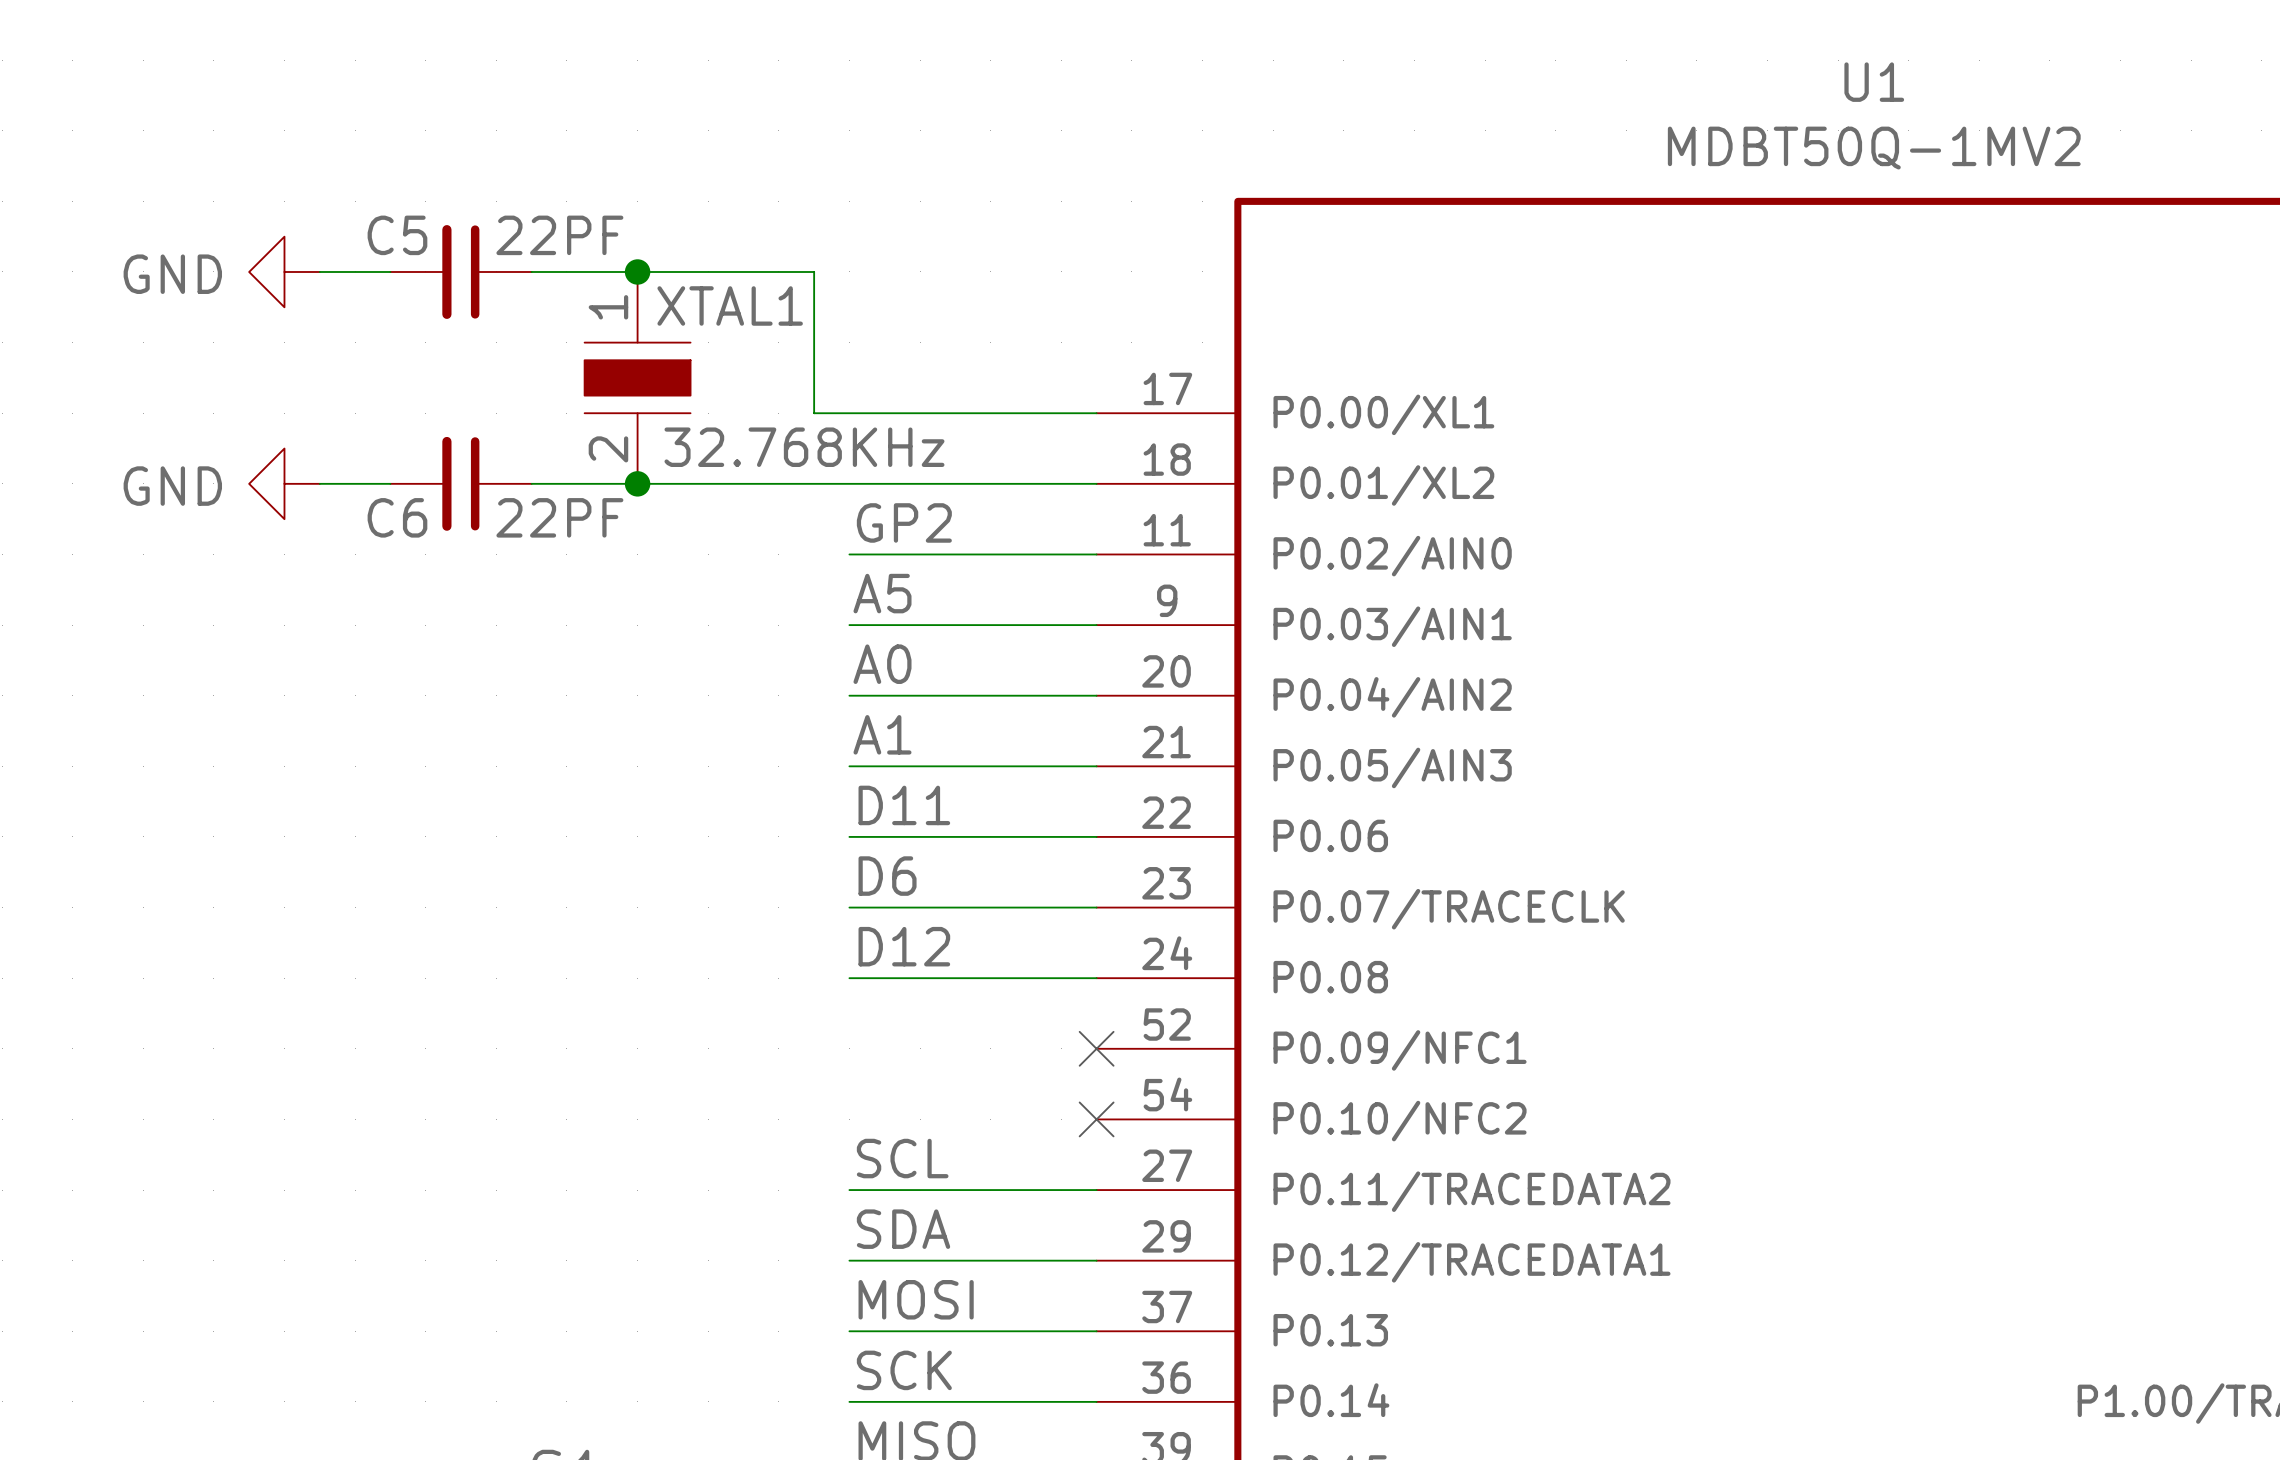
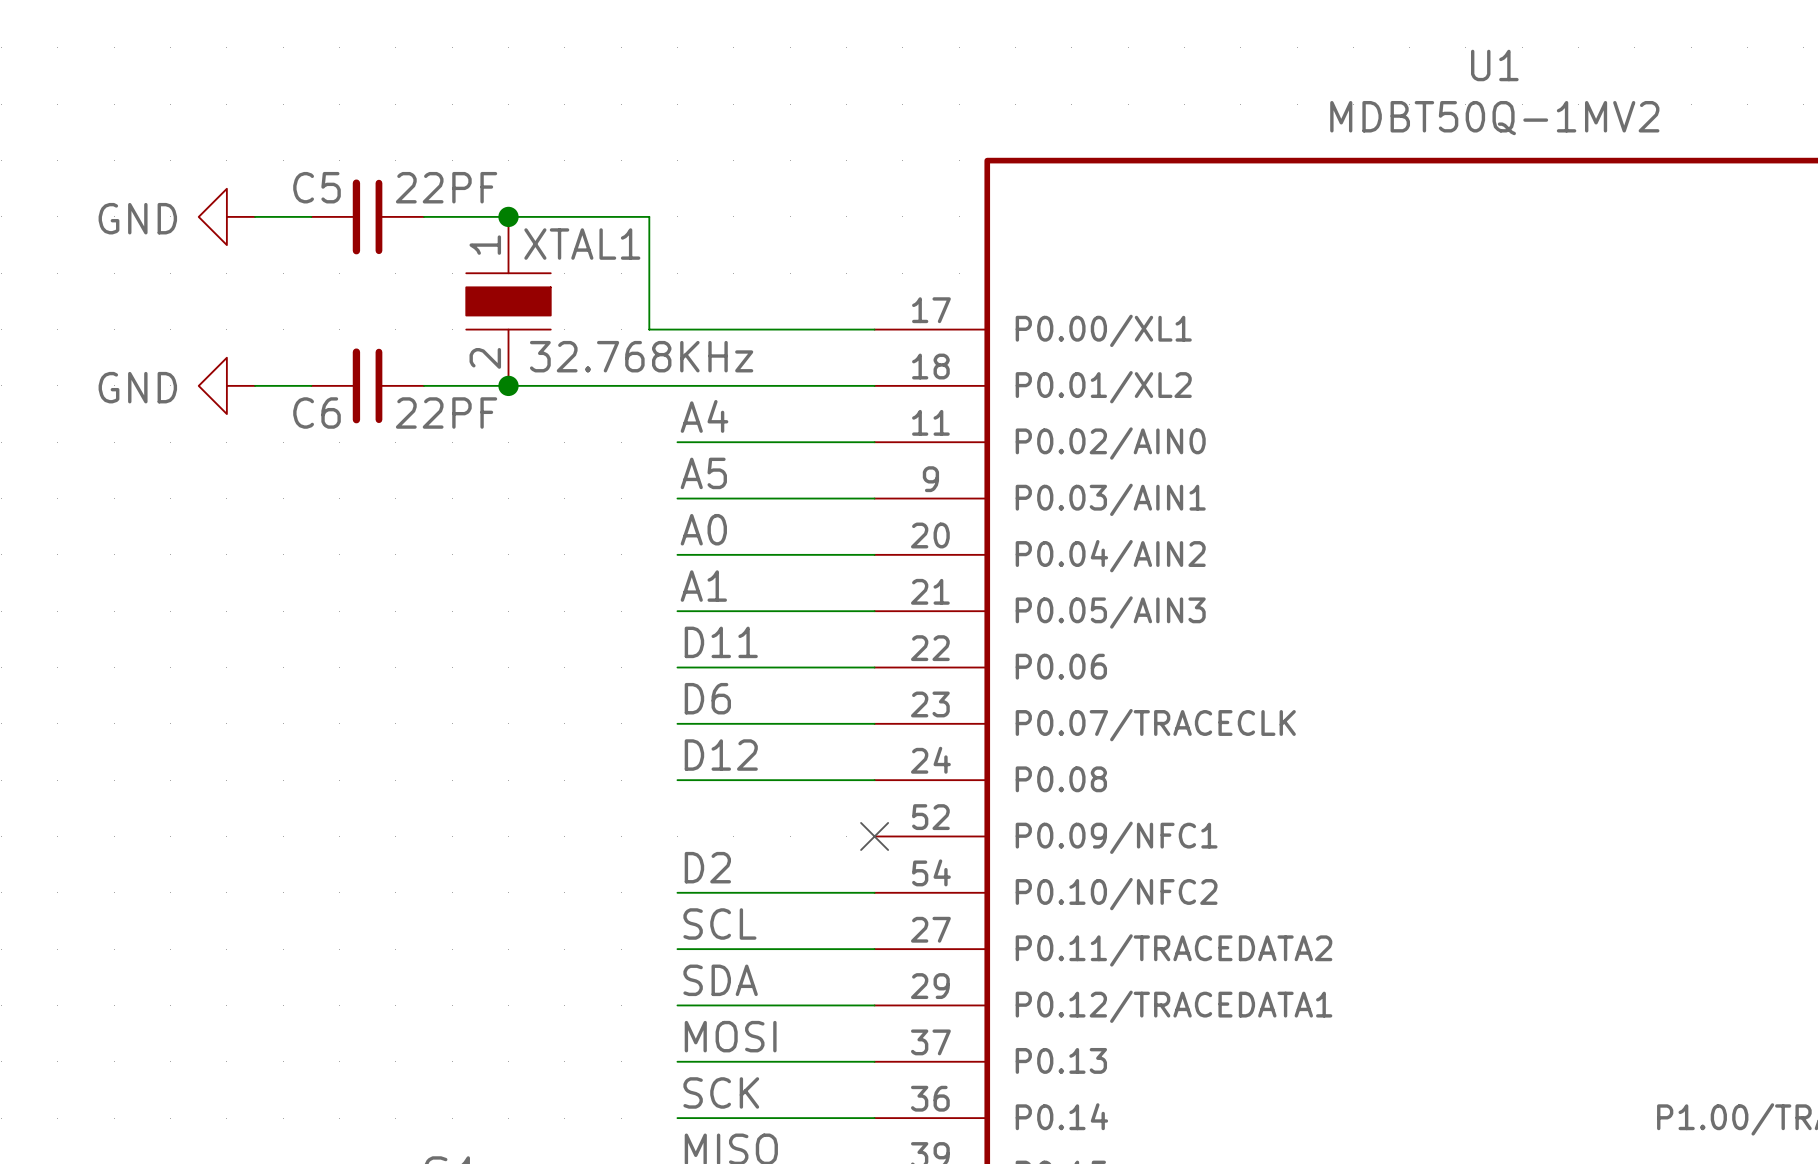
label: GP2 (904, 522) -> A4 (704, 416)
label: none -> D2 (707, 867)
wire: none -> (677, 892) (874, 892)
no-connect mark: (1096, 1119) -> none

